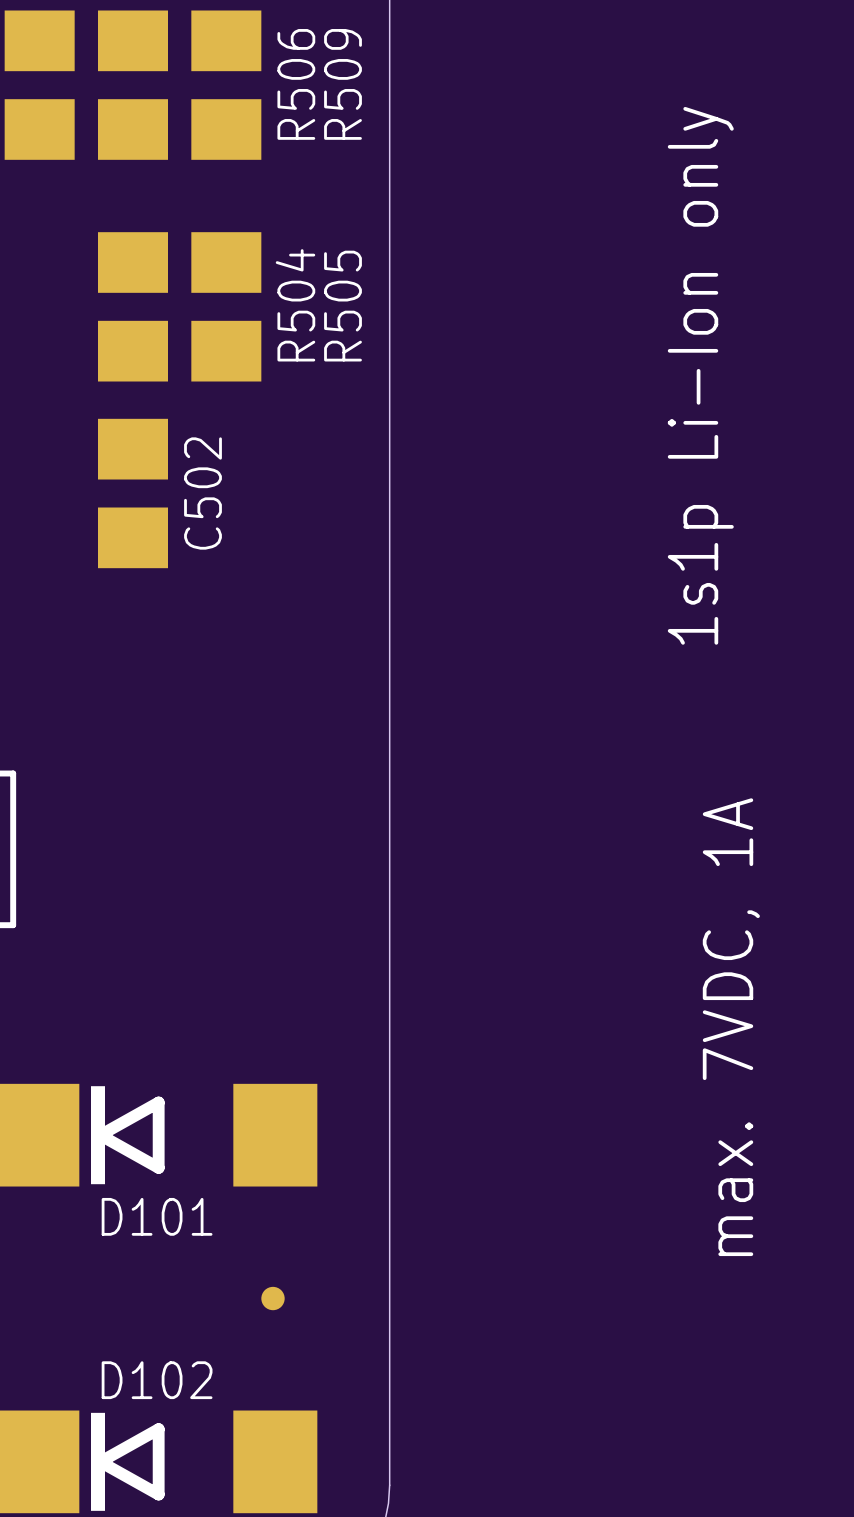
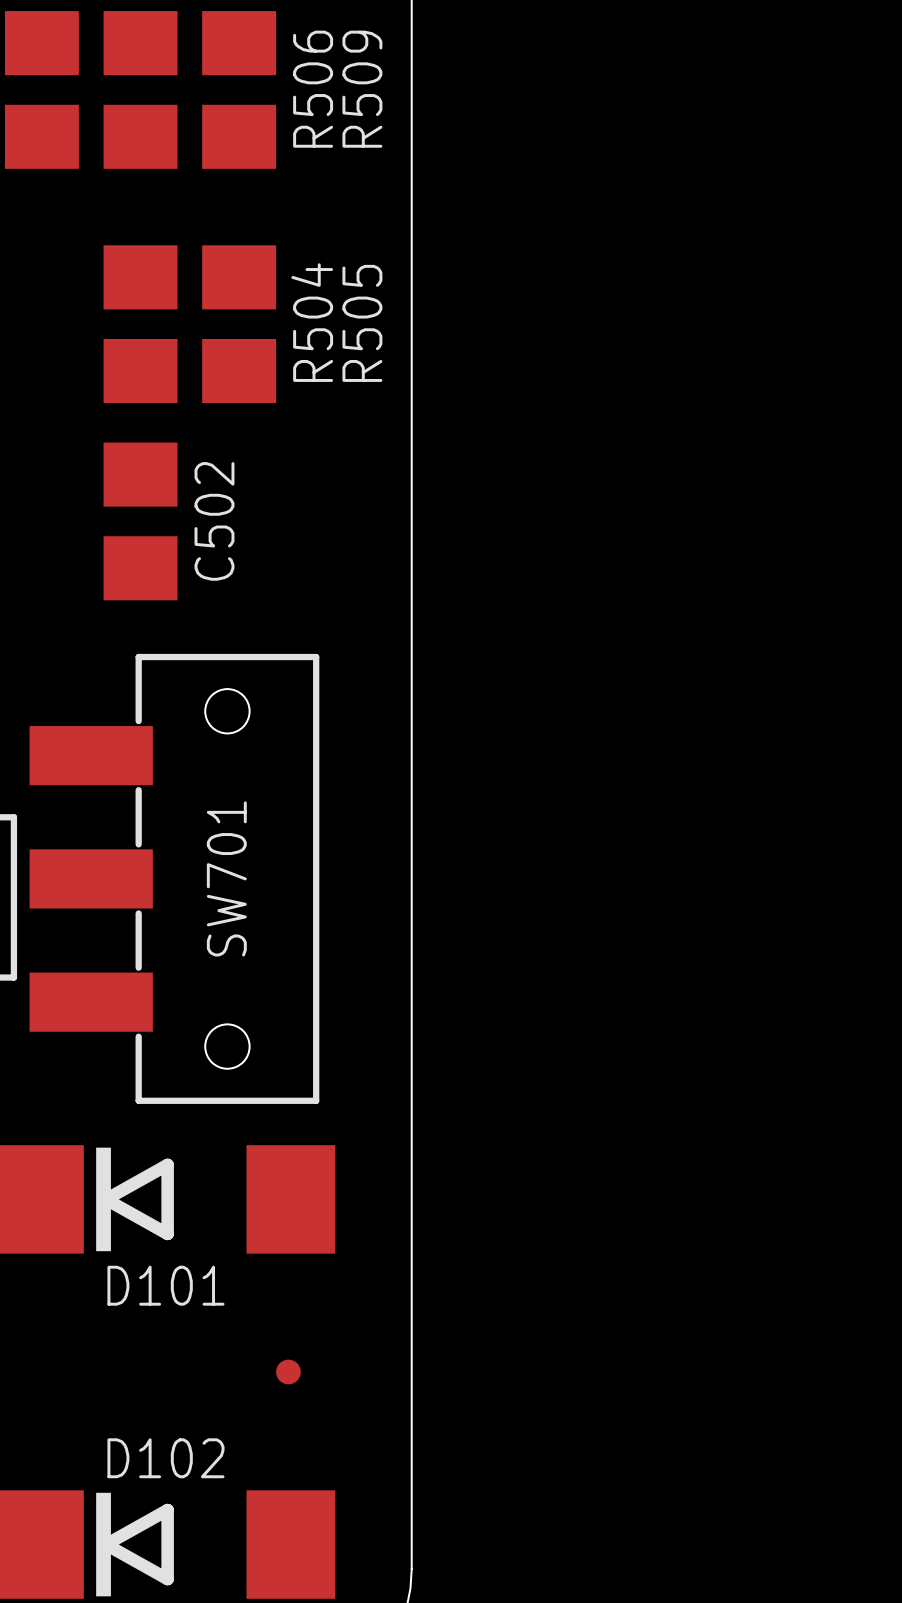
text: 1s1p Li-Ion only (700, 375) -> none
SW701: none -> (174, 878)
text: max. 7VDC, 1A (731, 1027) -> none

